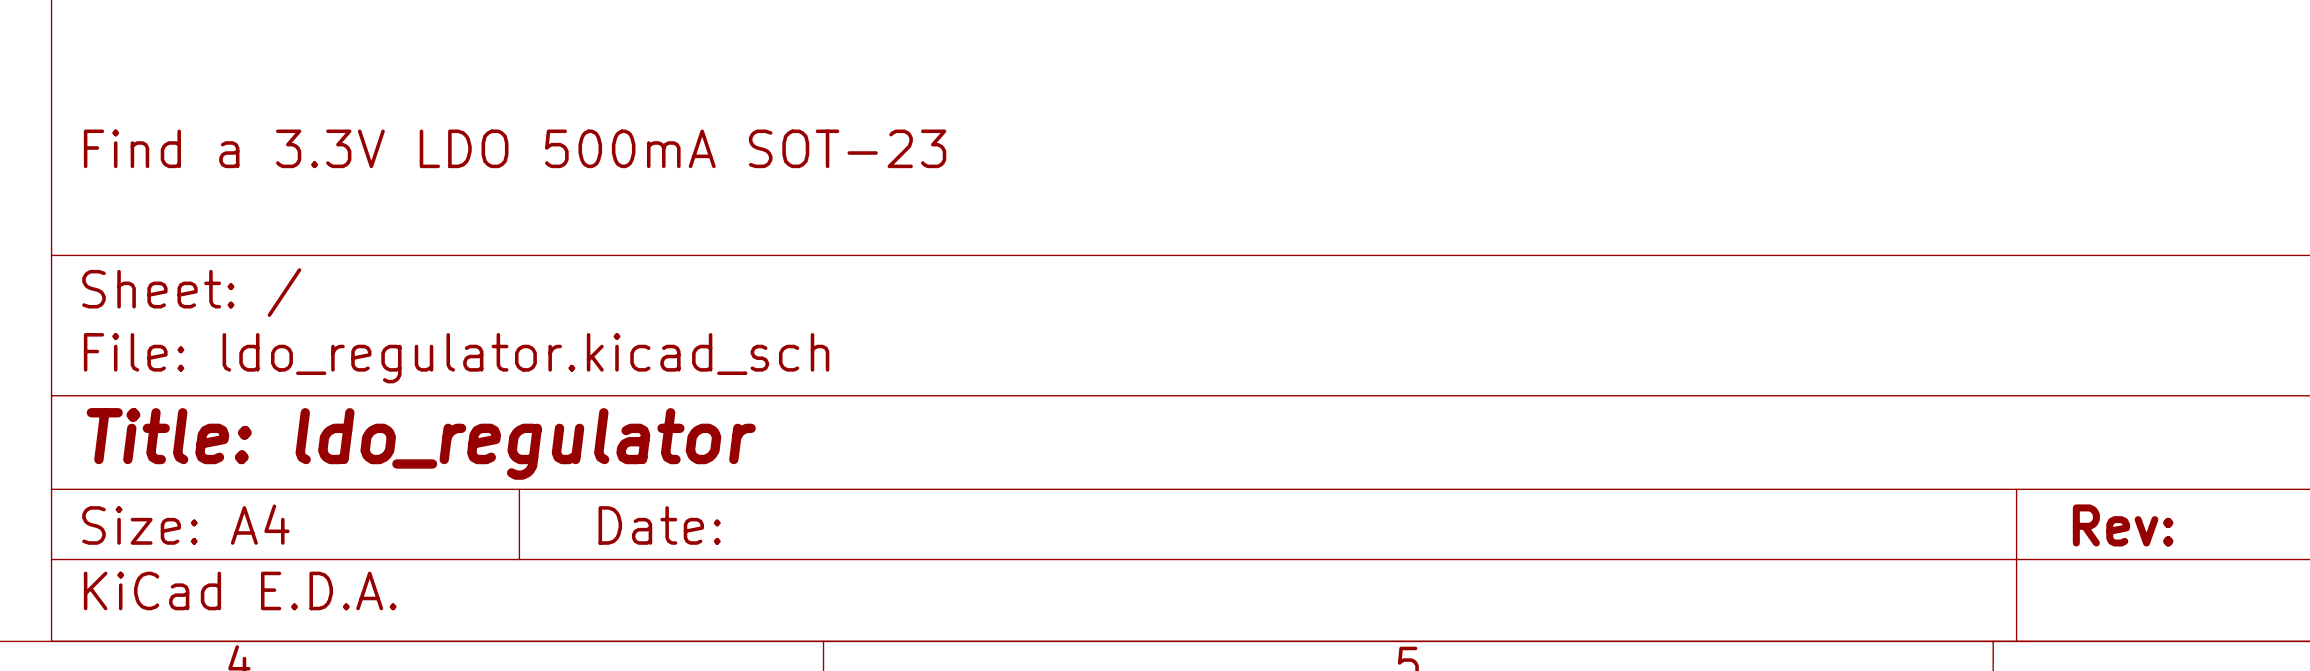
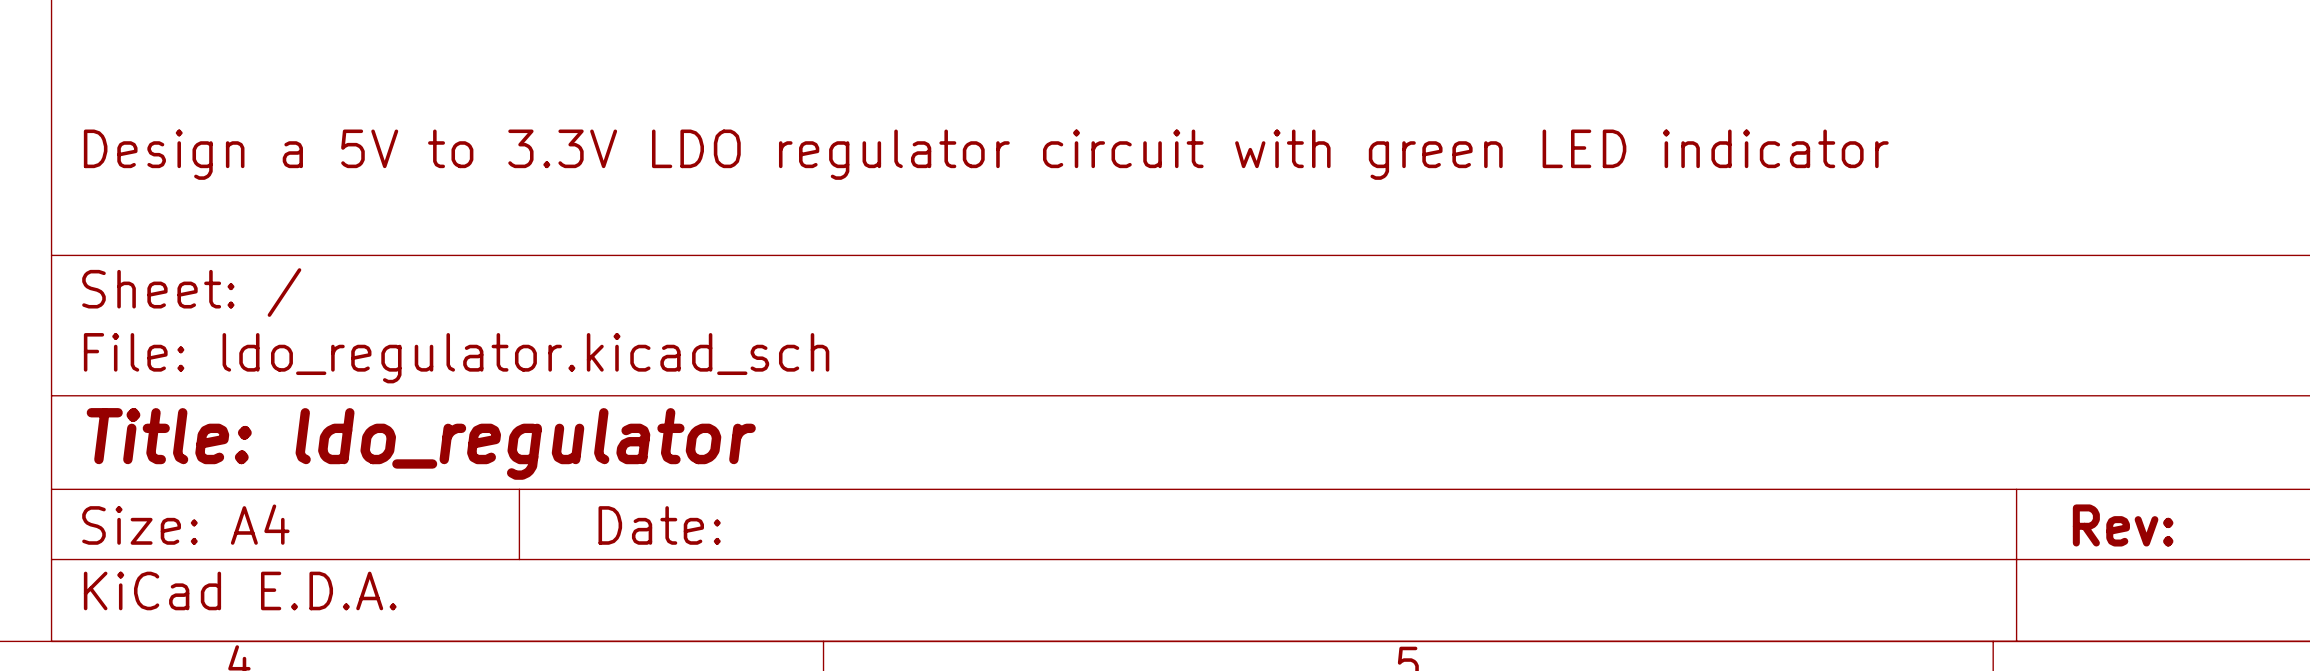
title block: Find a 3.3V LDO 500mA SOT-23 (515, 148) -> Design a 5V to 3.3V LDO regulator circuit with green LED indicator (986, 154)

